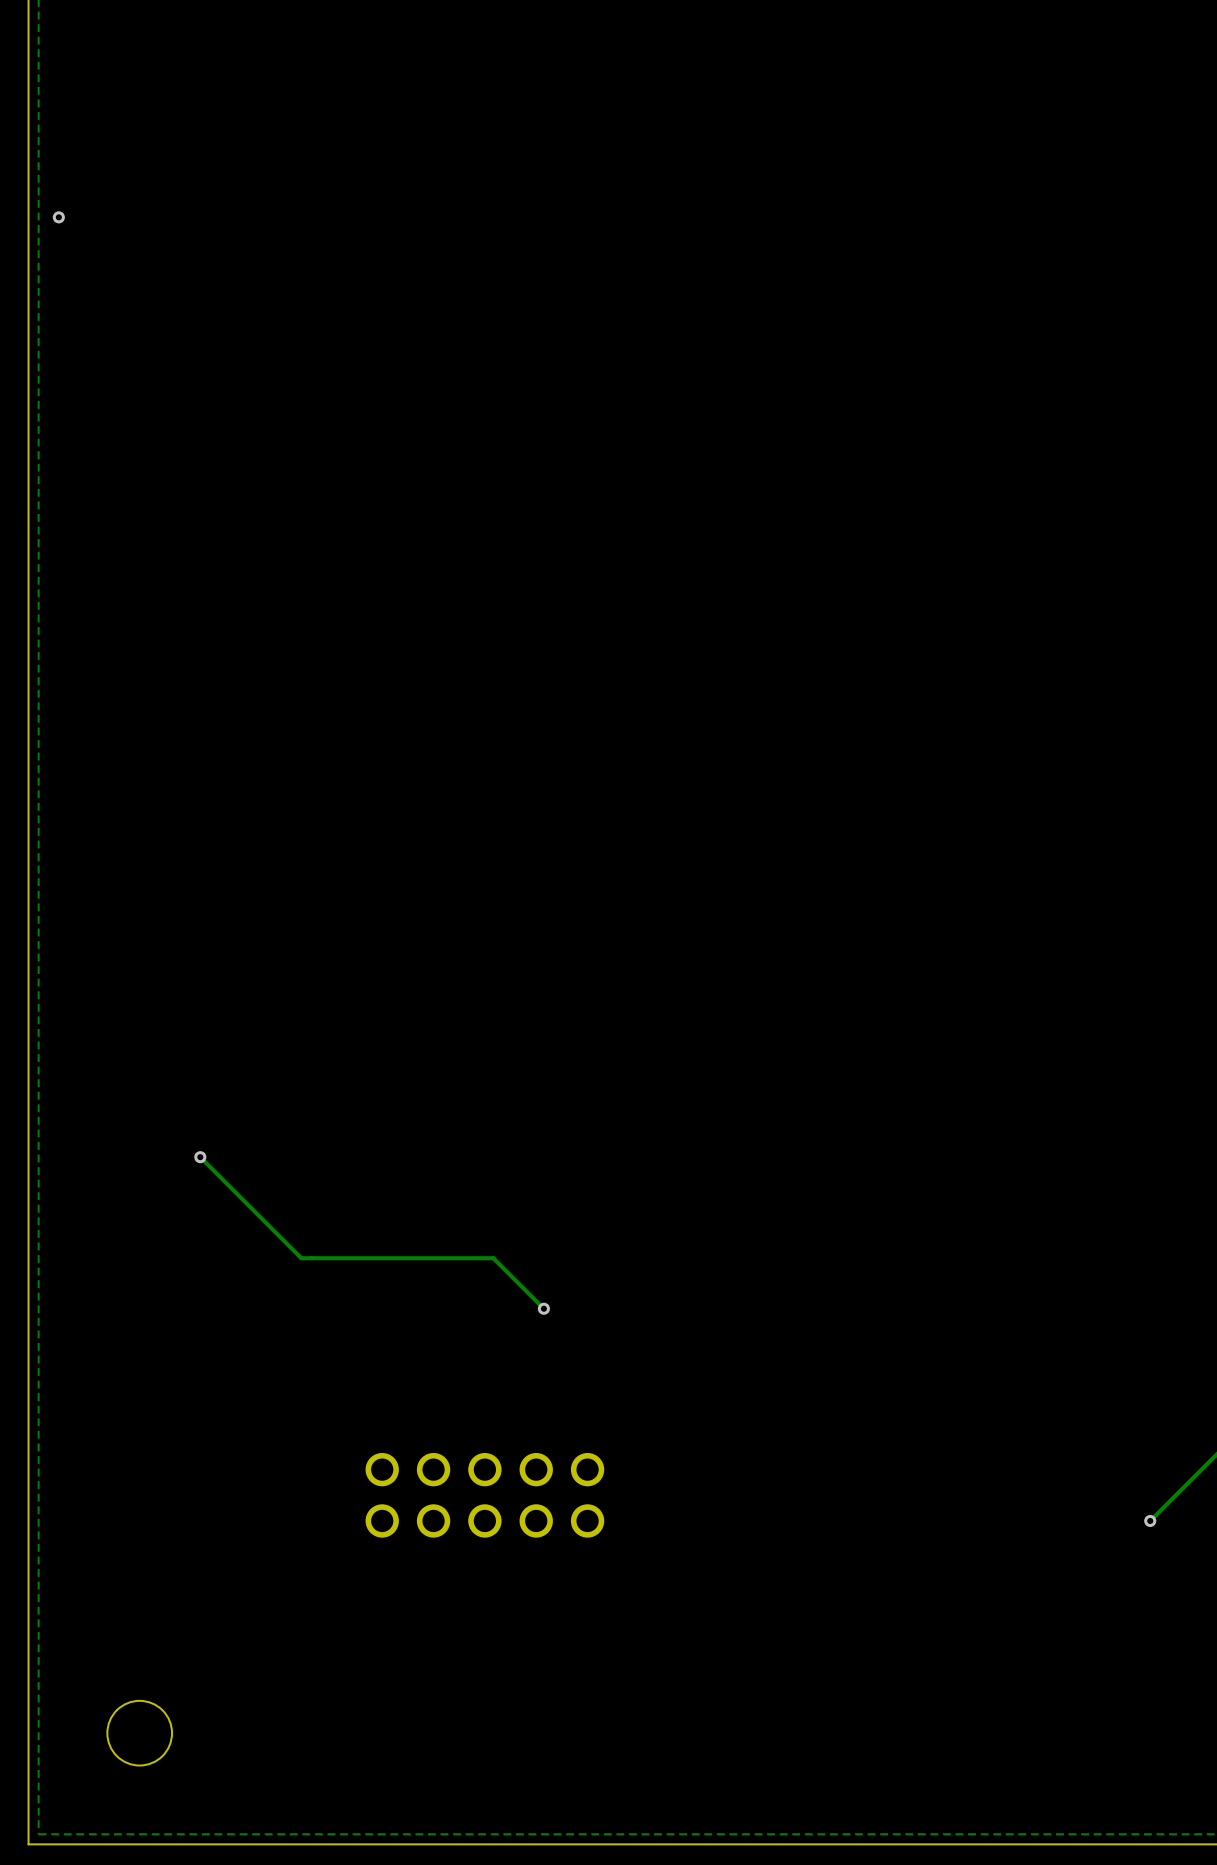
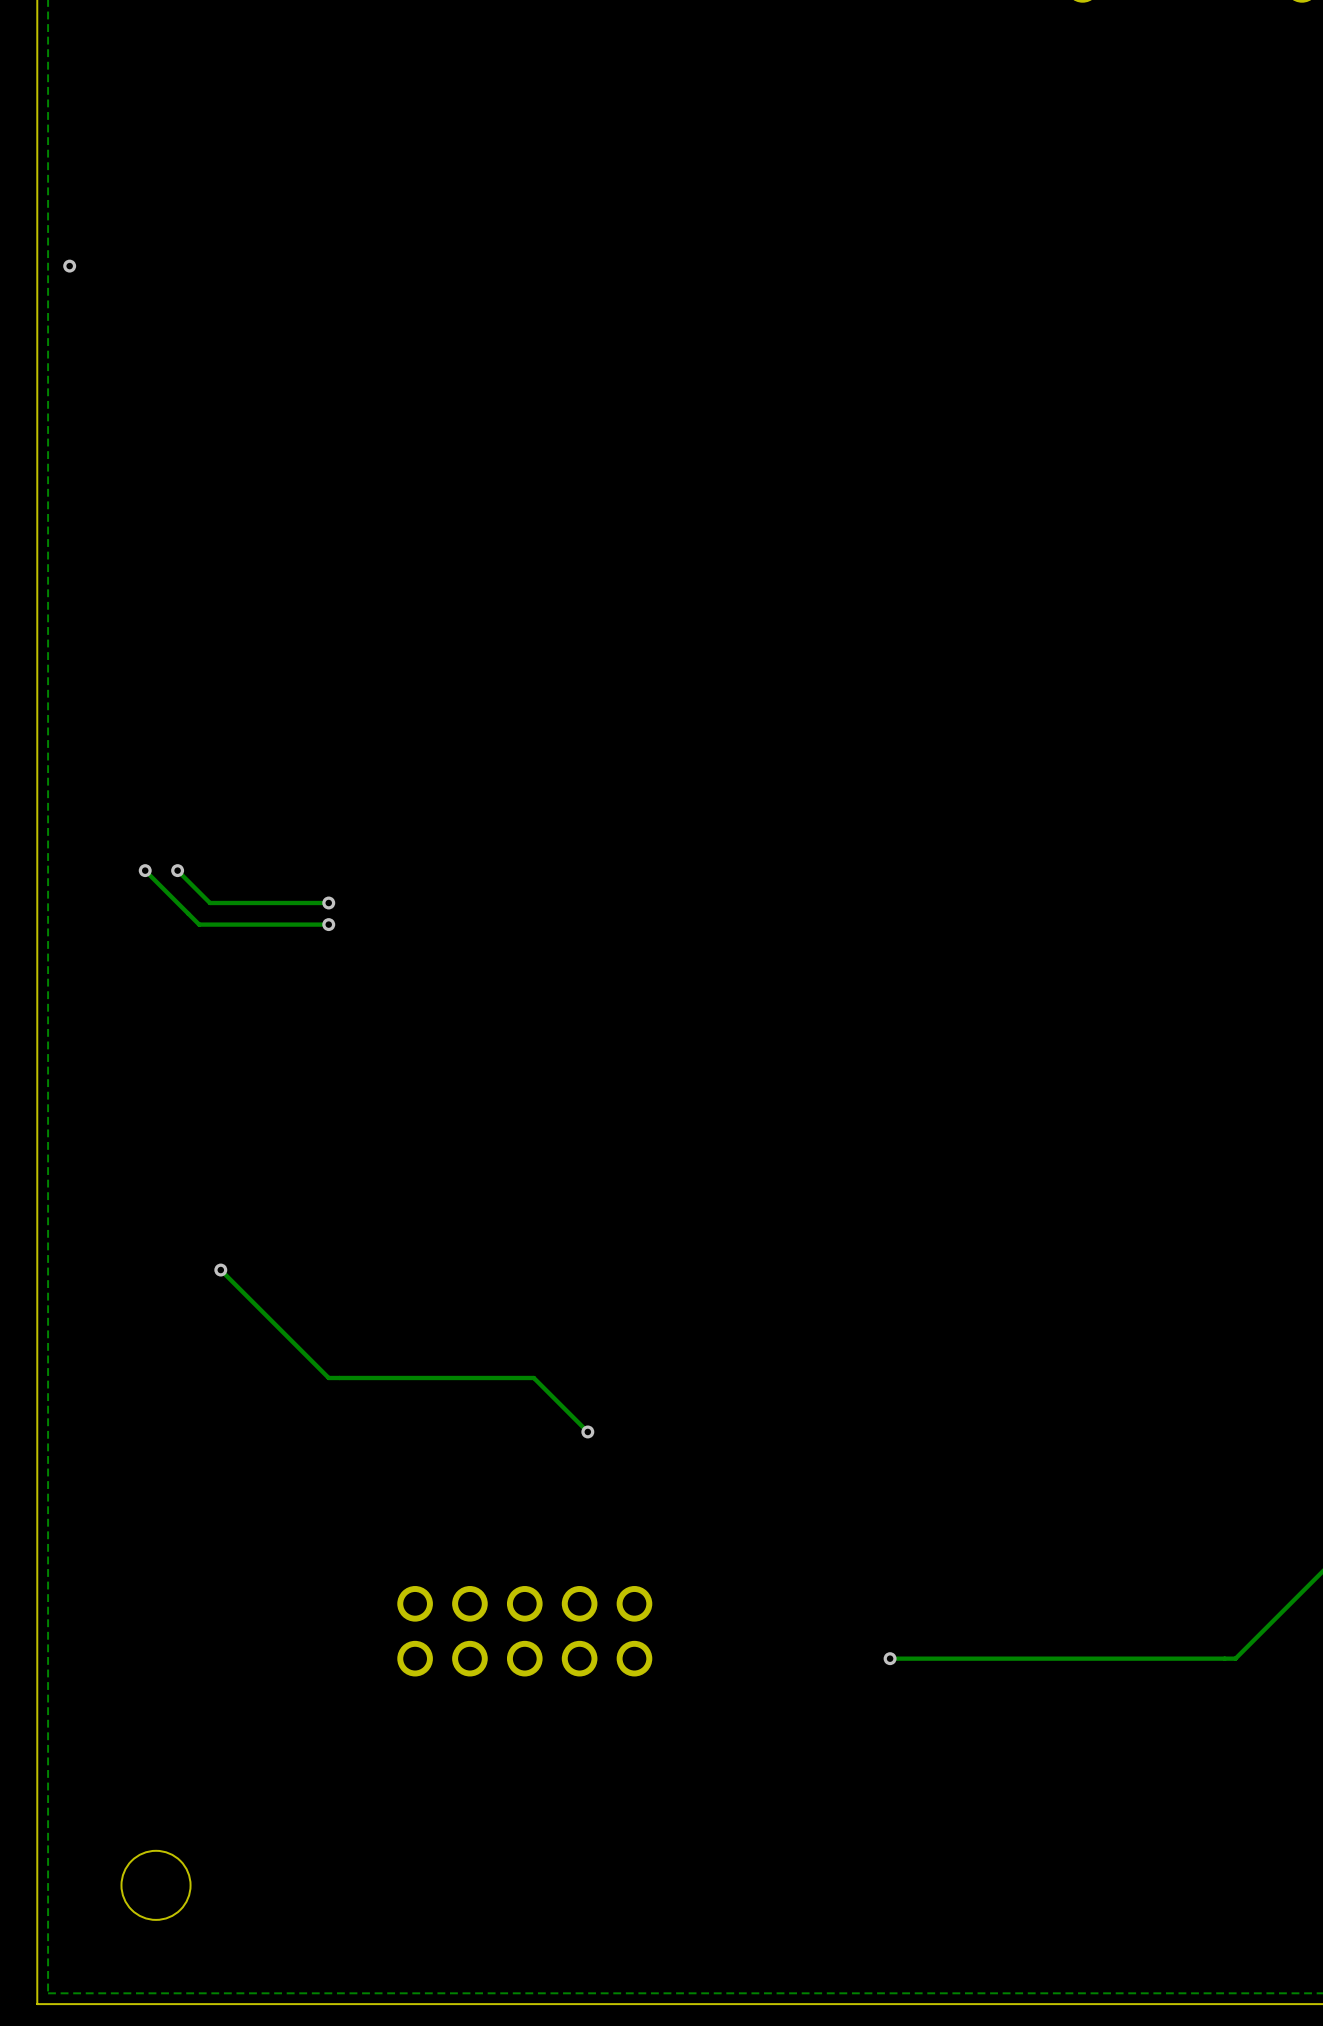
track: none -> (145, 870) (199, 924) (328, 924)
via: none -> (145, 870)
track: none -> (177, 870) (209, 903) (328, 903)
via: none -> (177, 870)
via: none -> (328, 903)
via: none -> (328, 924)
via: none -> (890, 1658)
track: none -> (1235, 1658) (890, 1658)
via: (1150, 1520) -> none

